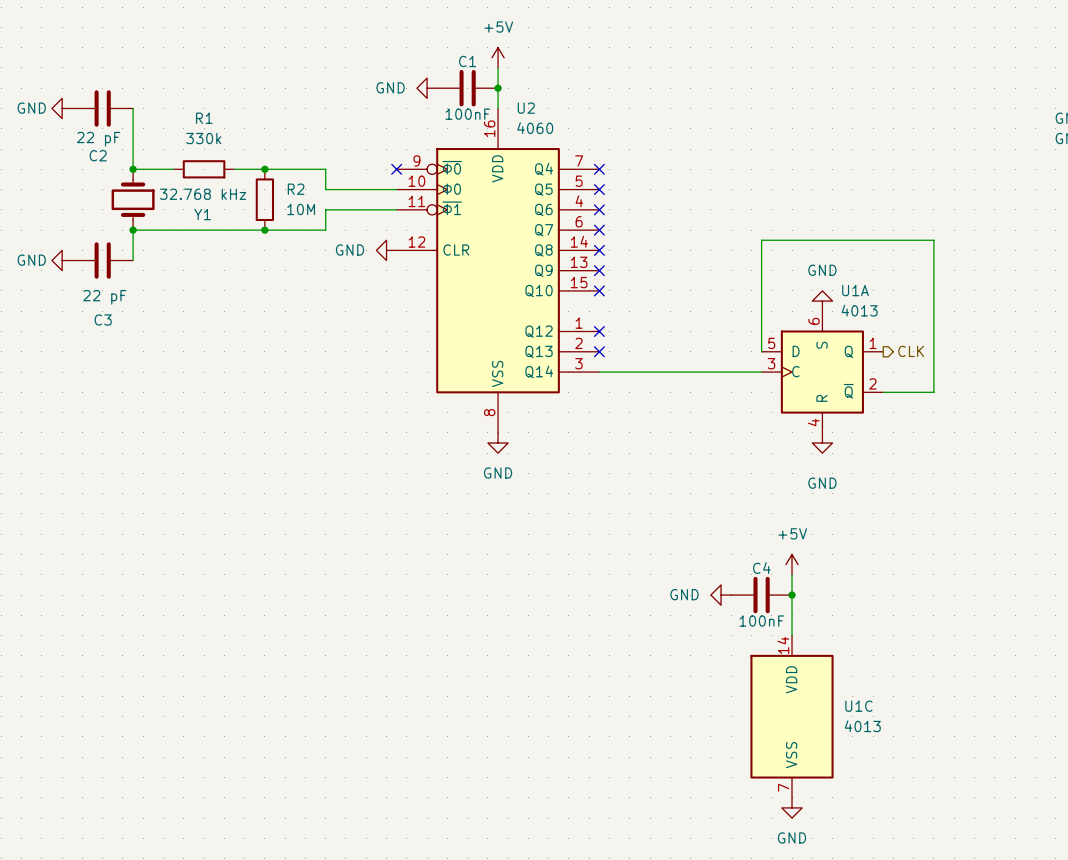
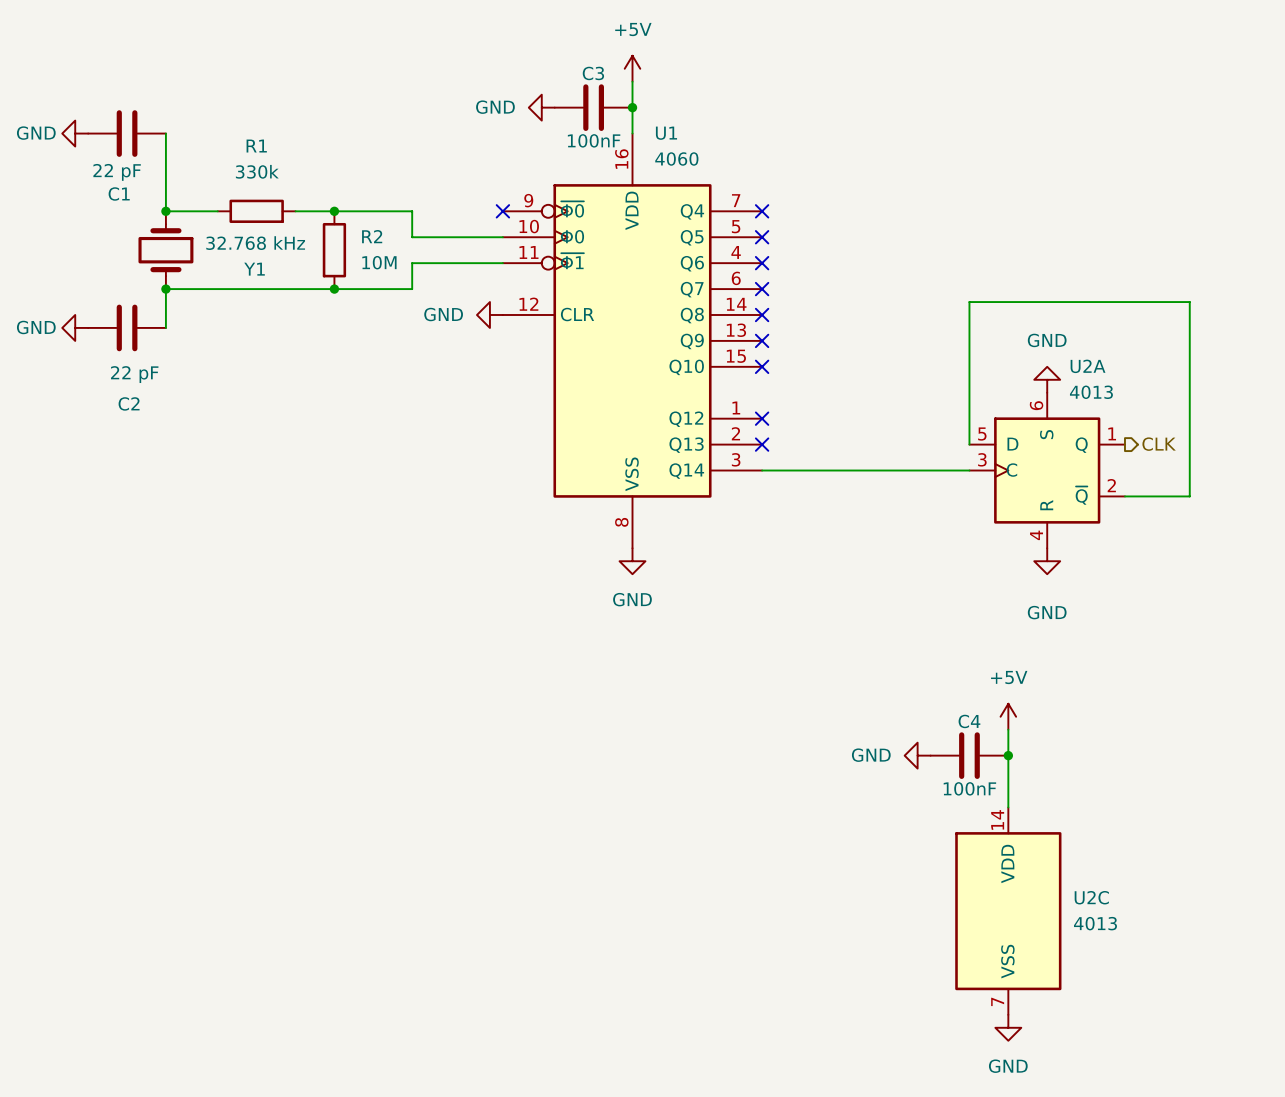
C1 name: C1 (467, 61) -> C3 (593, 73)
U2 name: U2 (526, 108) -> U1 (666, 133)
C2 name: C2 (98, 155) -> C1 (119, 193)
U1A name: U1A (855, 290) -> U2A (1088, 366)
C3 name: C3 (103, 319) -> C2 (129, 403)
U1C name: U1C (858, 706) -> U2C (1091, 897)

